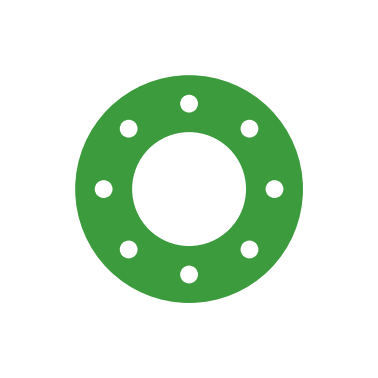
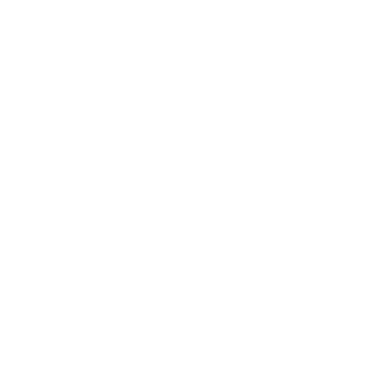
part: (189, 189) -> none

